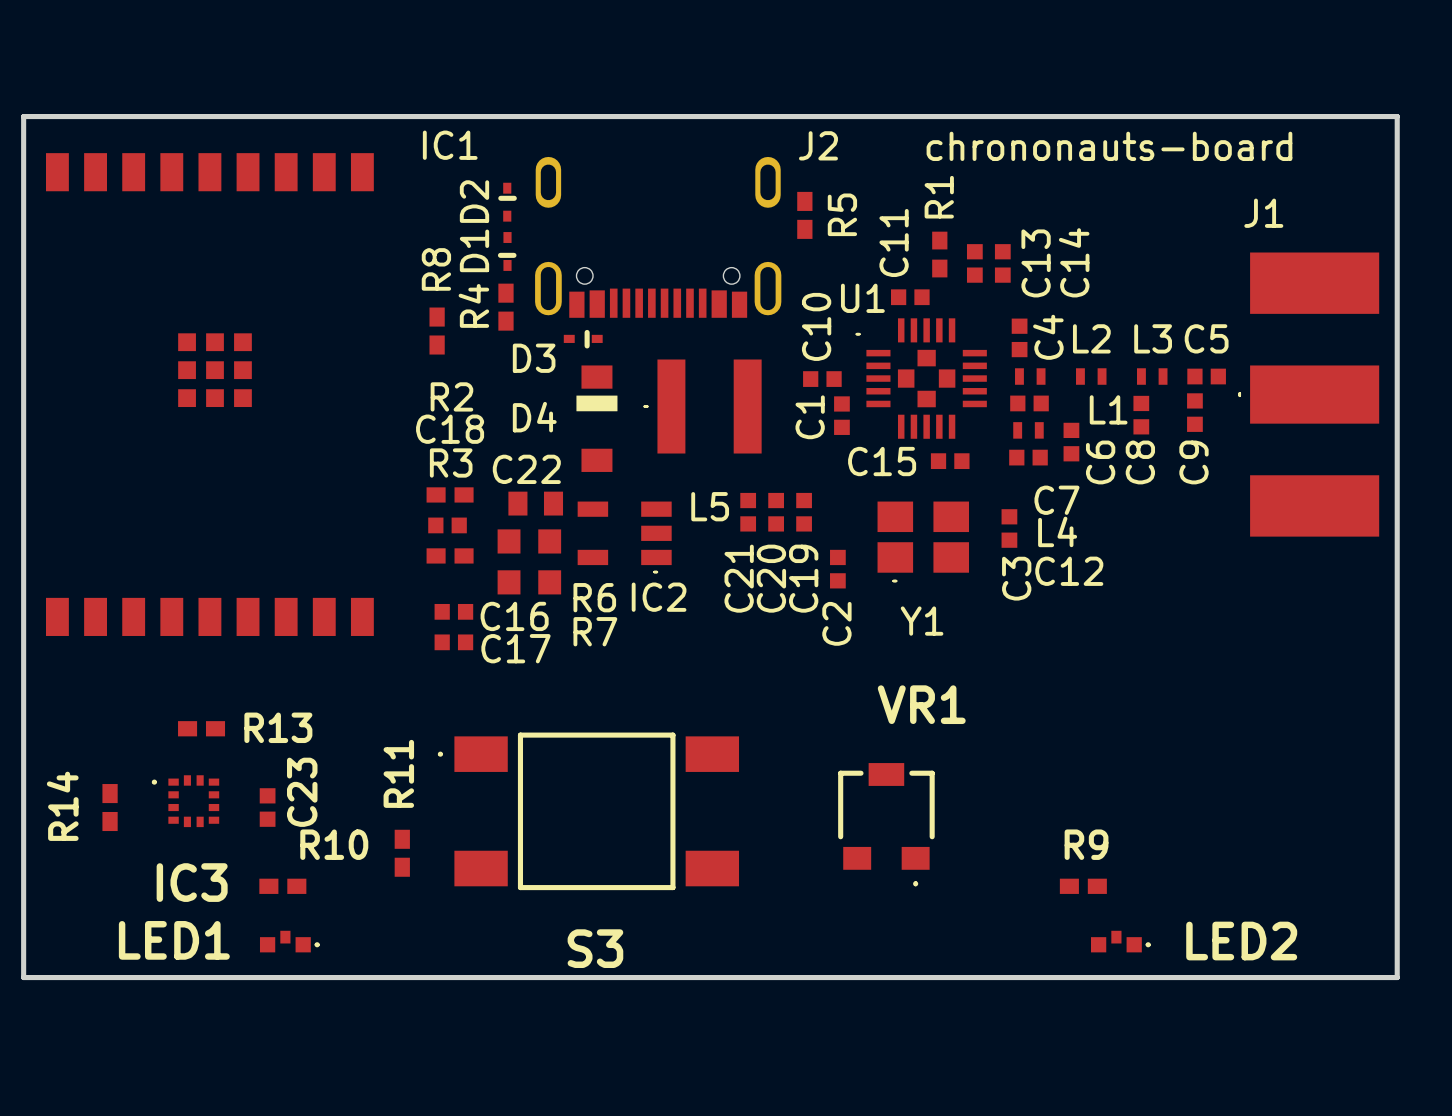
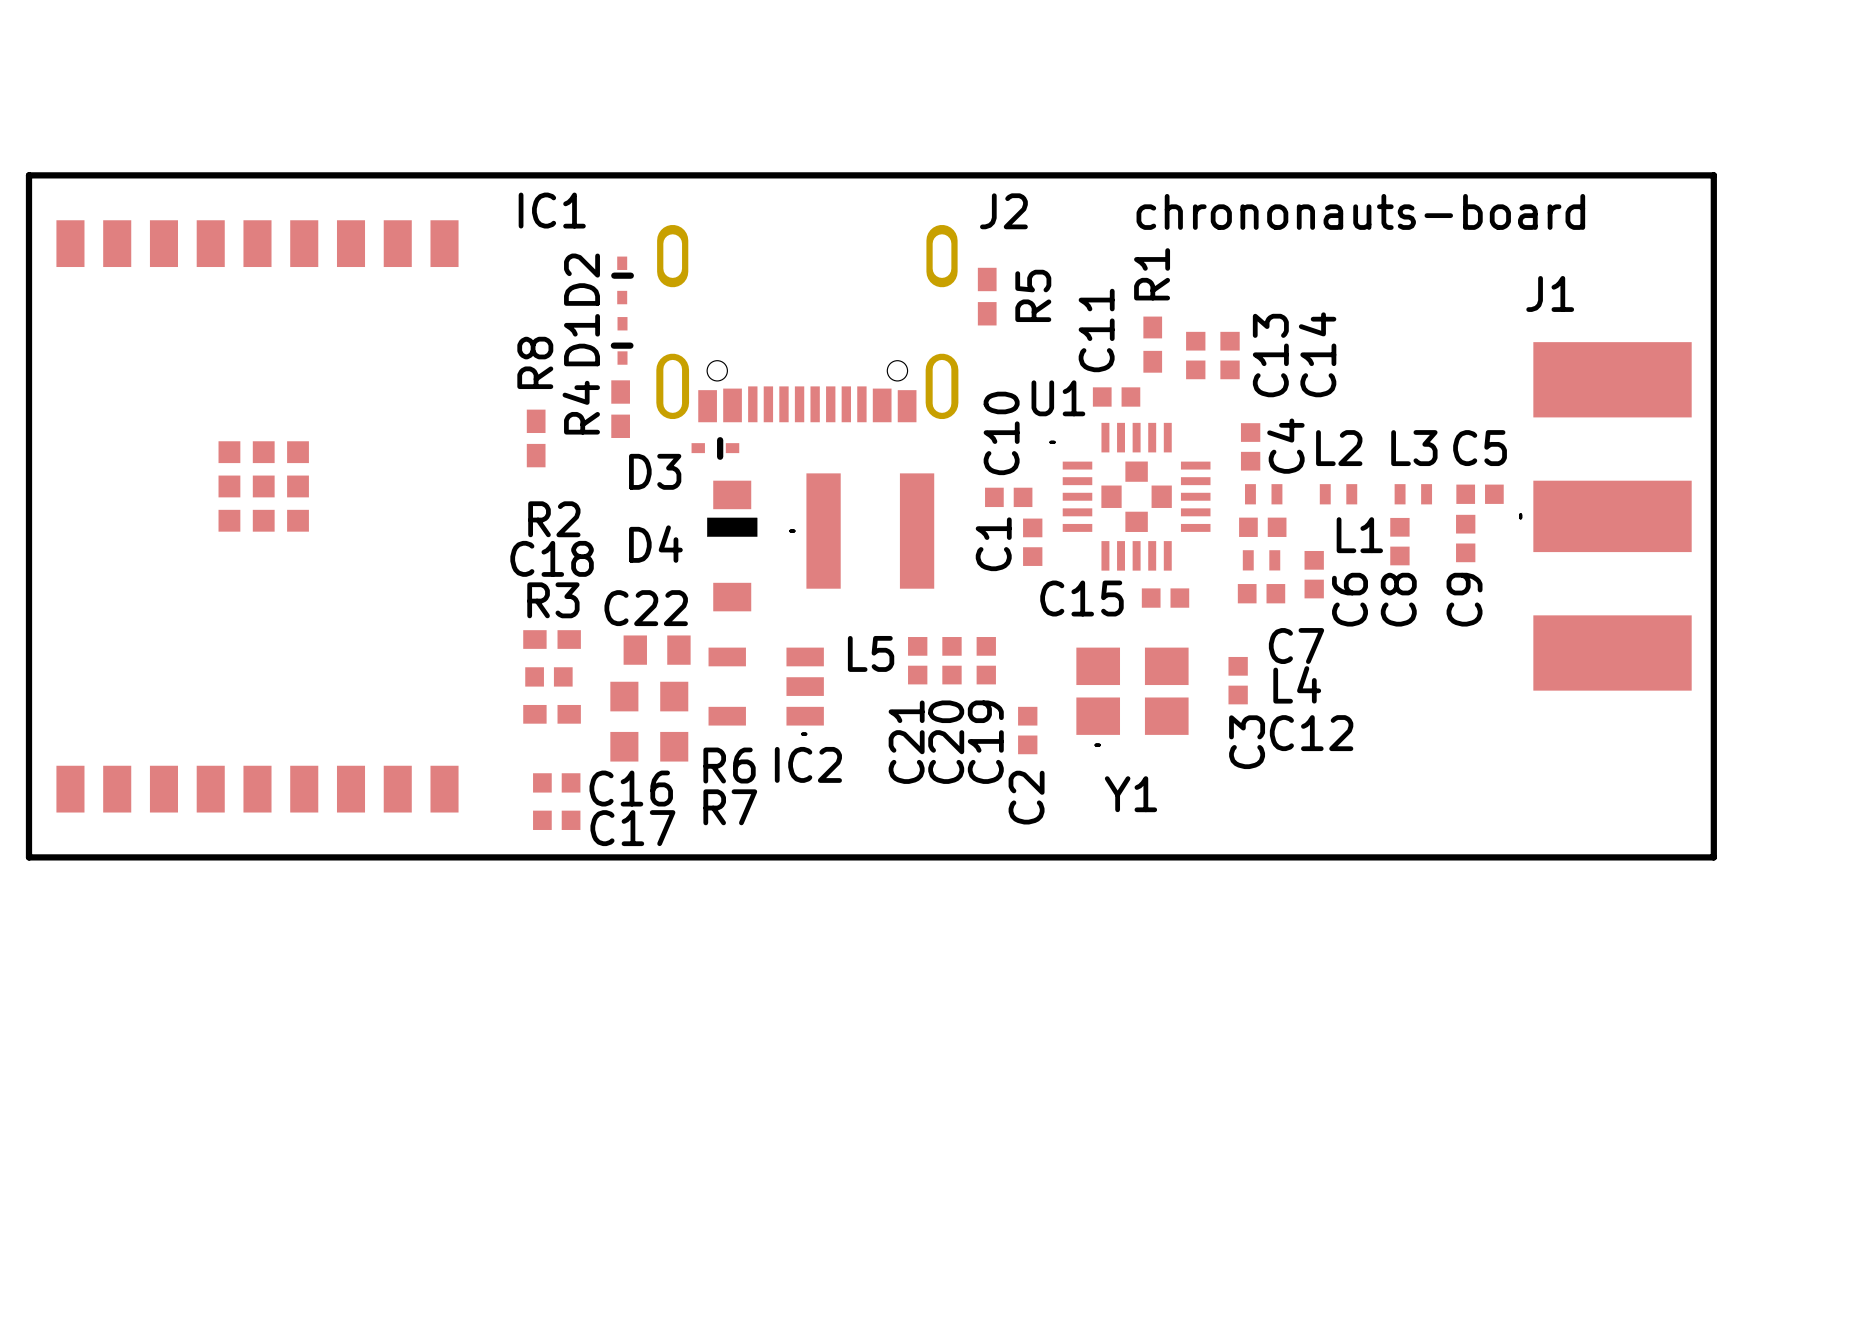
board edge: (23, 672) (23, 977) (1397, 977) (1397, 672) -> (28, 857) (1713, 857)
R13: (201, 728) -> none
IC3: (185, 801) -> none
R14: (110, 807) -> none
C23: (267, 807) -> none
S3: (588, 811) -> none
VR1: (886, 824) -> none
R11: (402, 853) -> none
R10: (282, 886) -> none
R9: (1083, 886) -> none
LED1: (289, 941) -> none
LED2: (1120, 941) -> none

